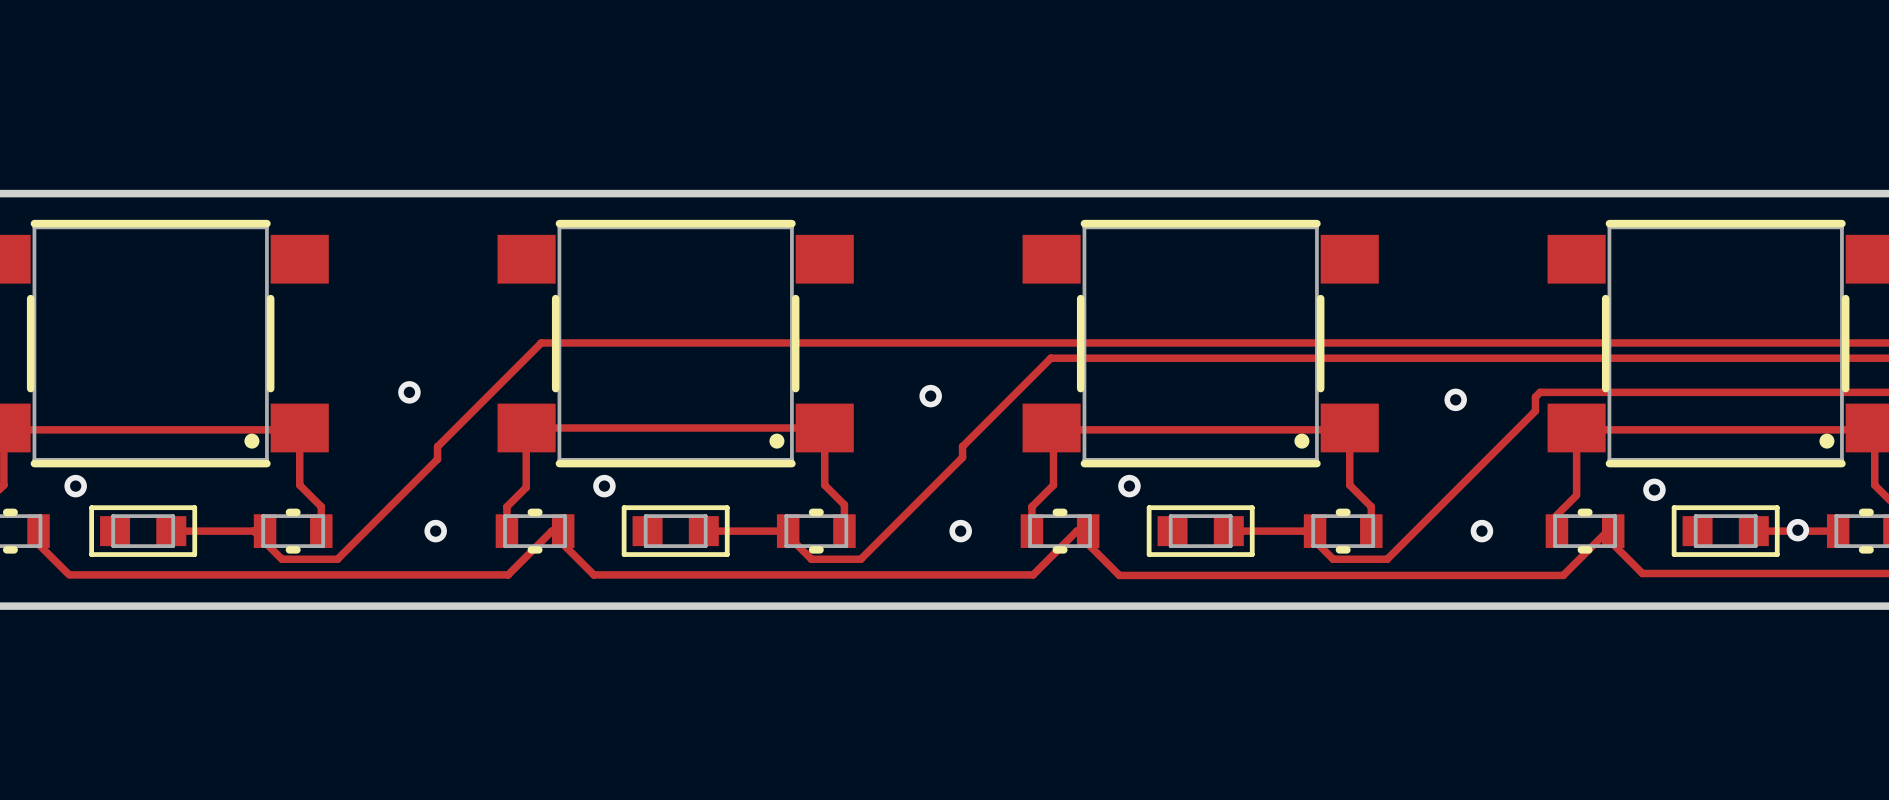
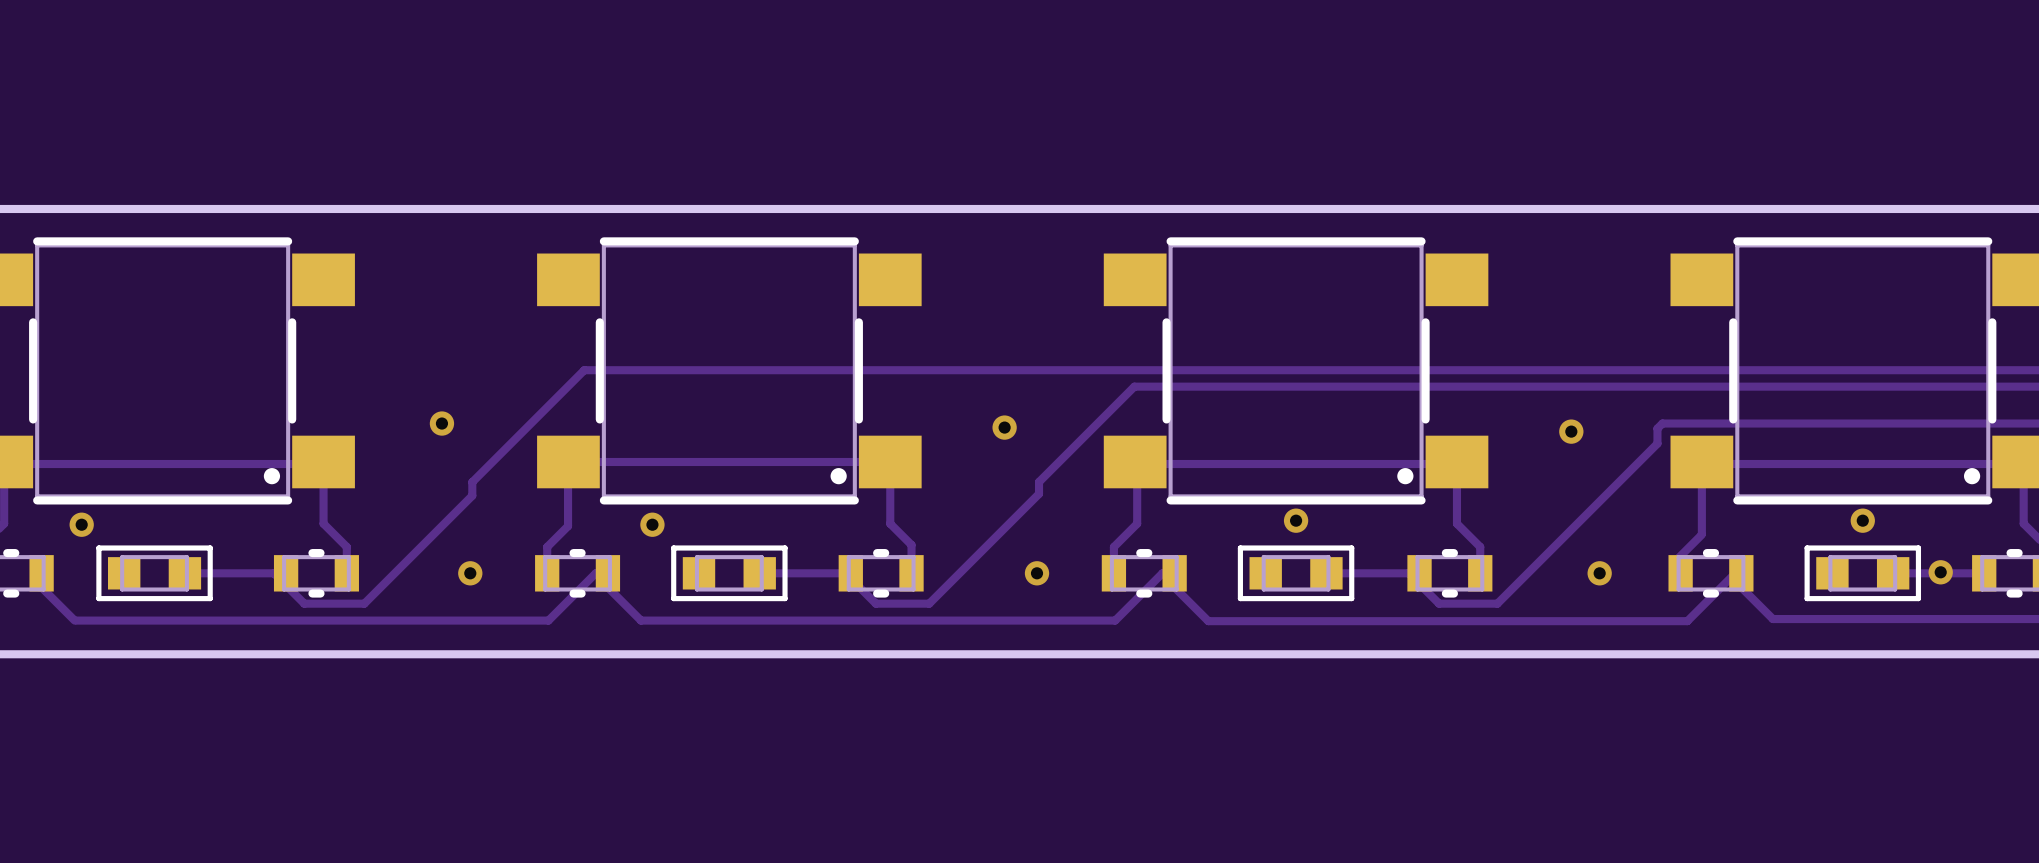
via position: (1129, 486) -> (1296, 520)
via position: (1654, 489) -> (1862, 520)

